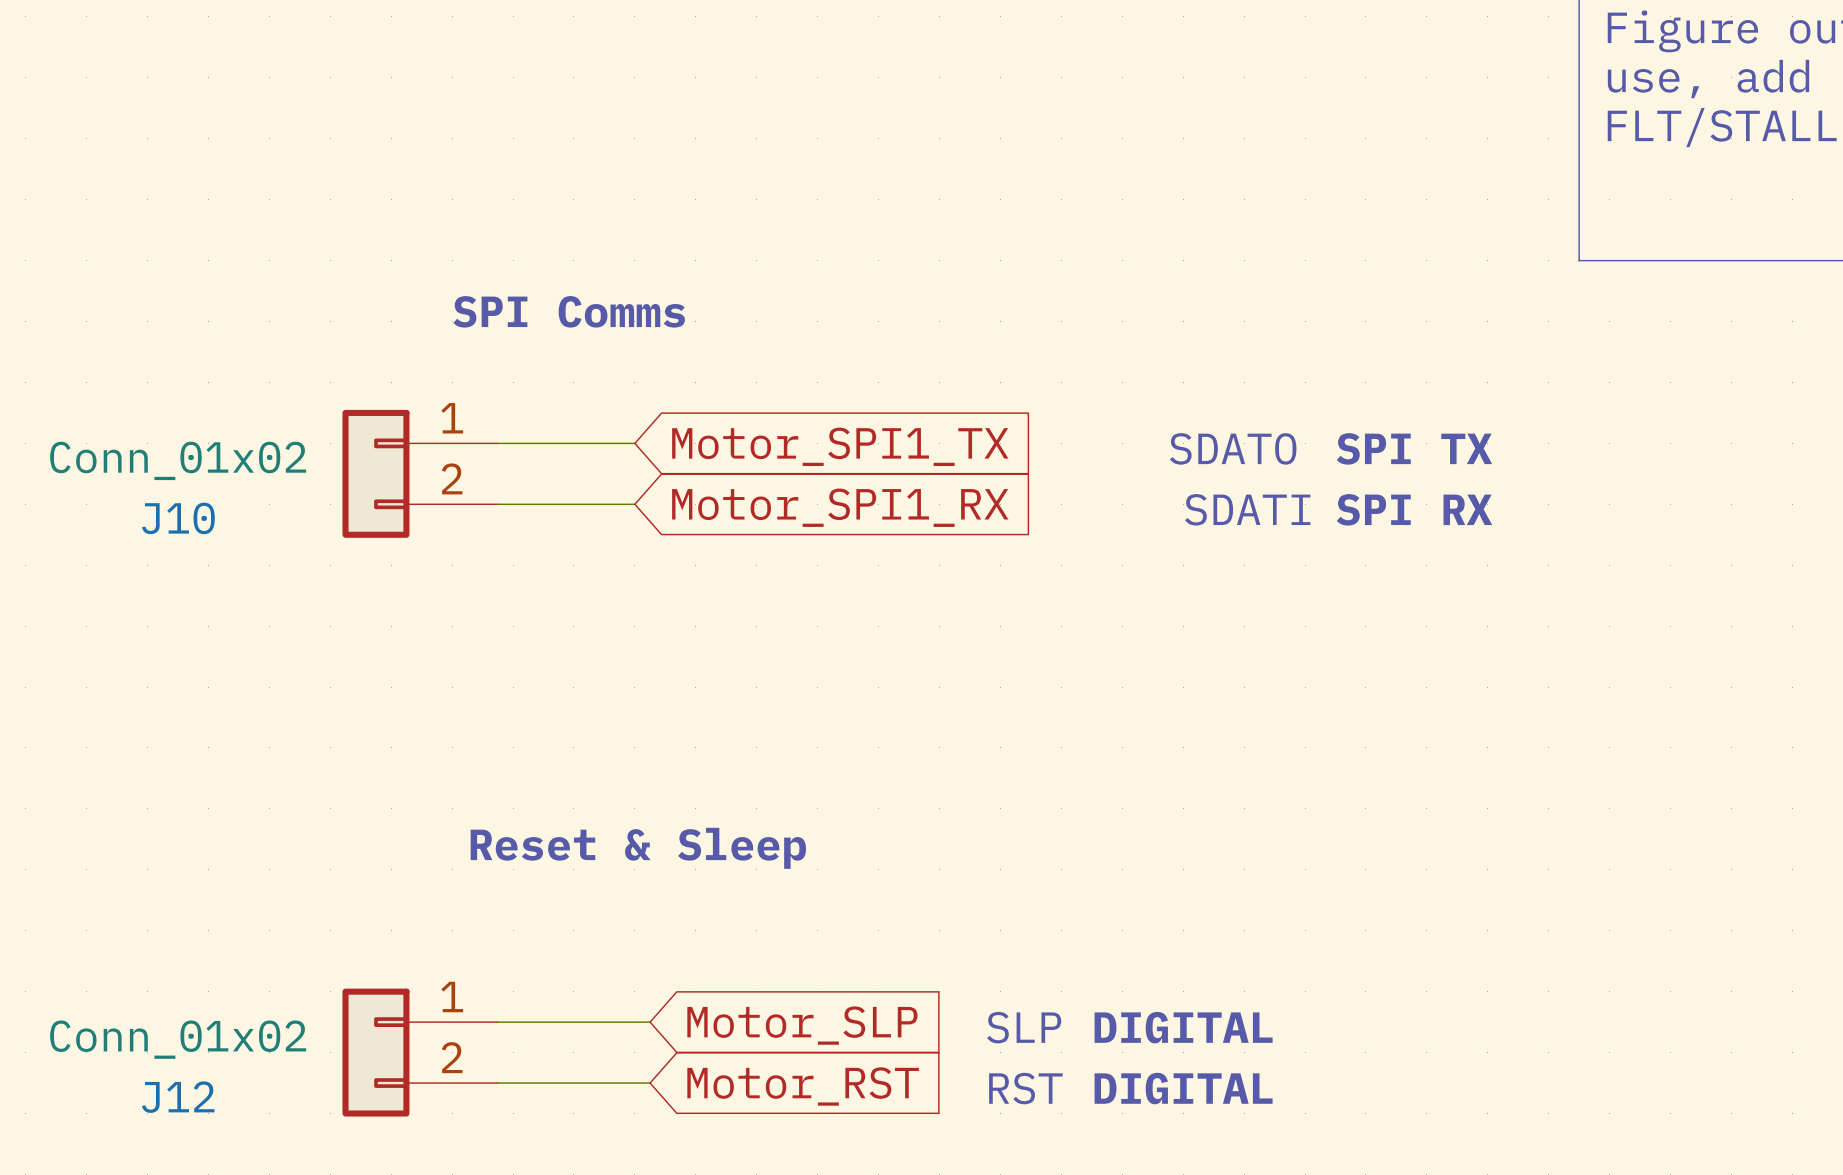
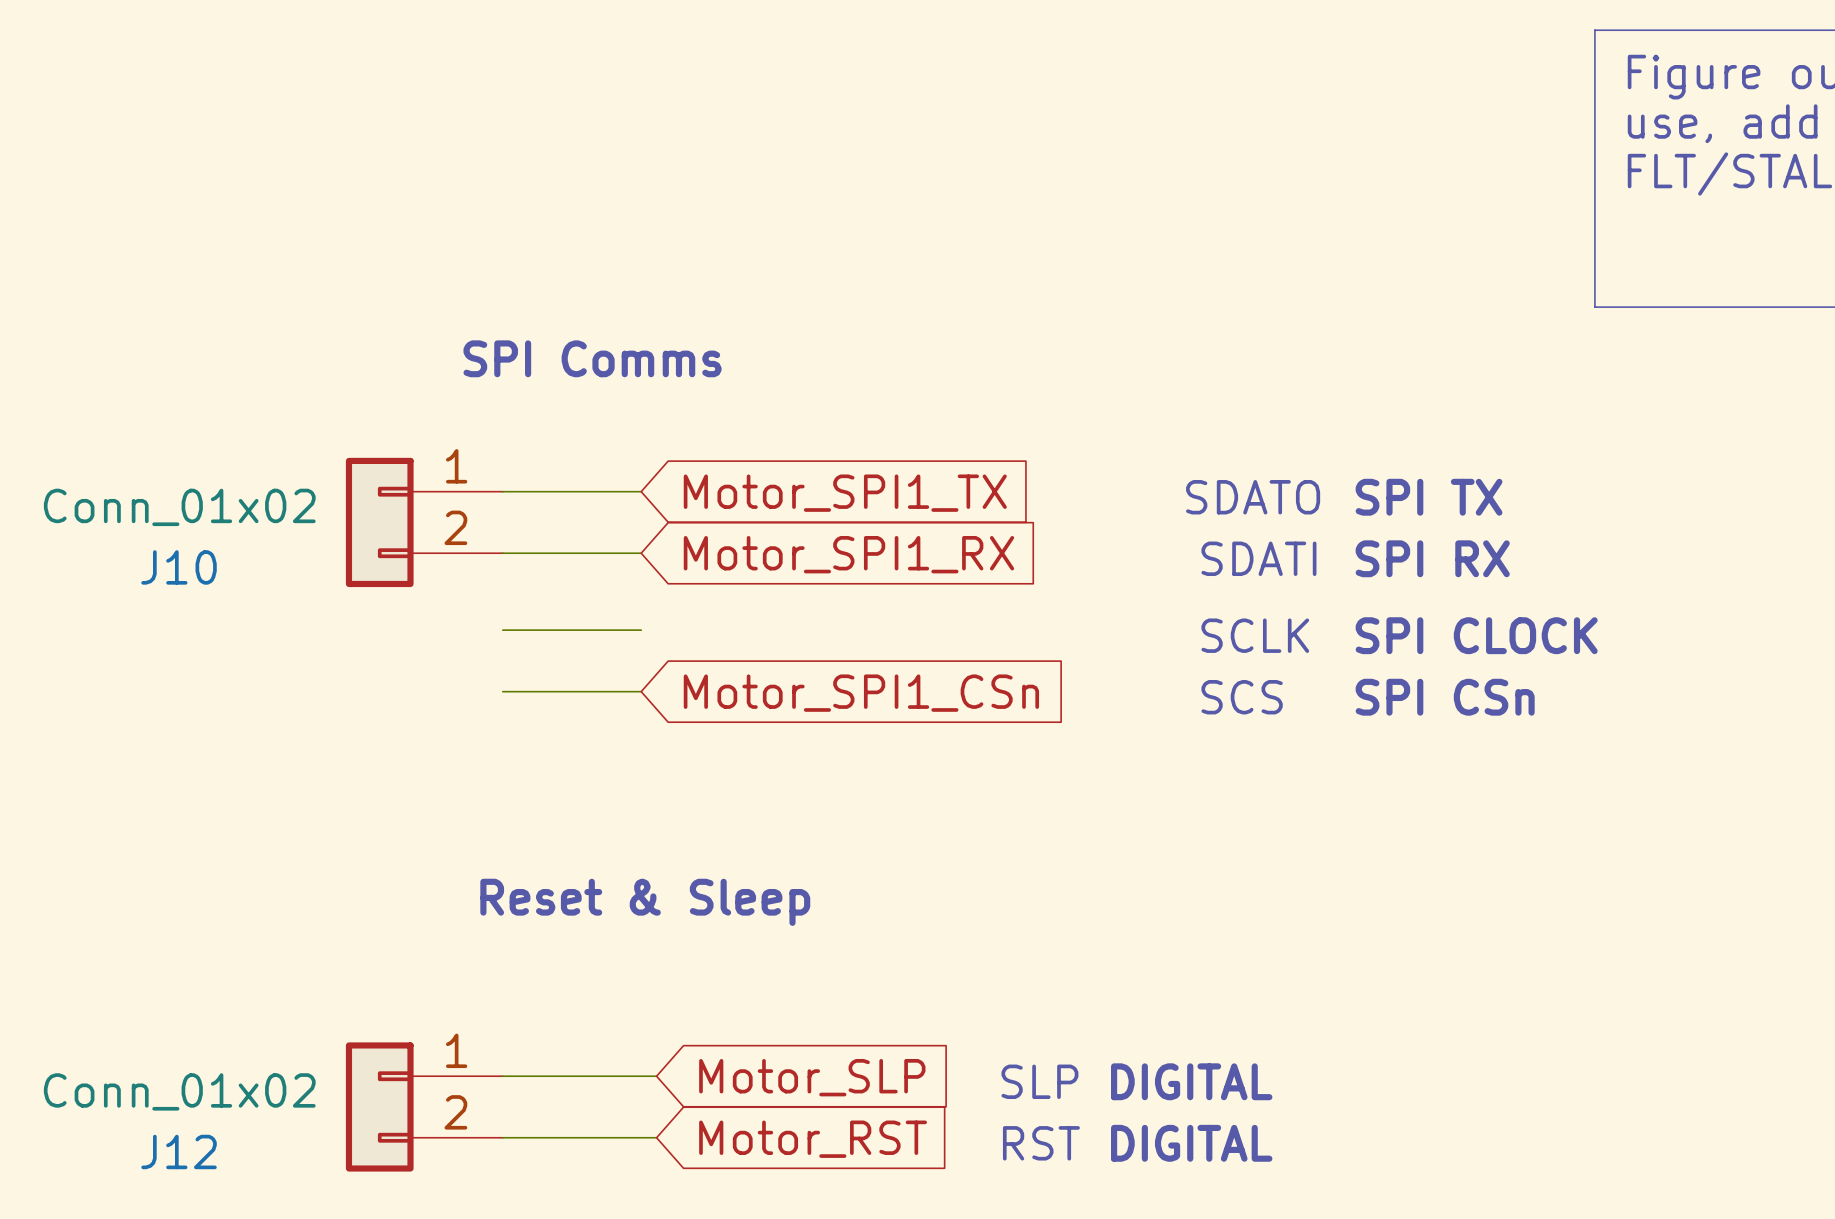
wire: none -> (502, 630) (641, 630)
text: none -> SCLK (1255, 635)
text: none -> SPI CLOCK (1476, 635)
wire: none -> (502, 691) (641, 691)
global label: none -> Motor_SPI1_CSn (861, 693)
text: none -> SCS (1242, 697)
text: none -> SPI CSn (1445, 697)

